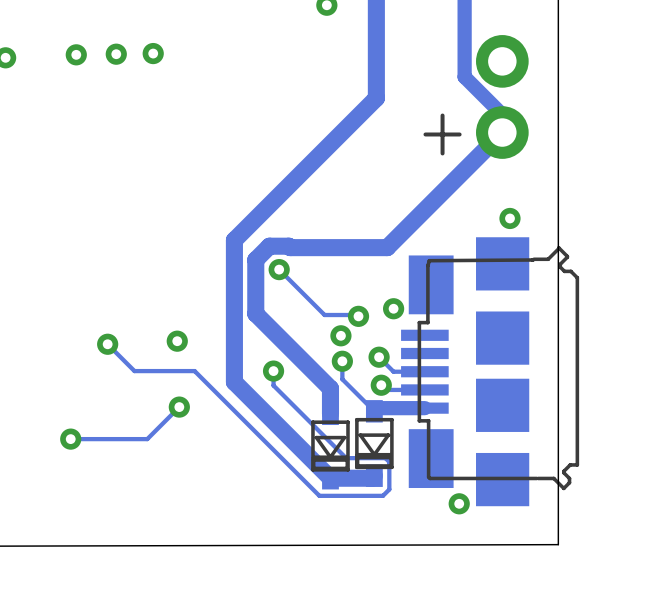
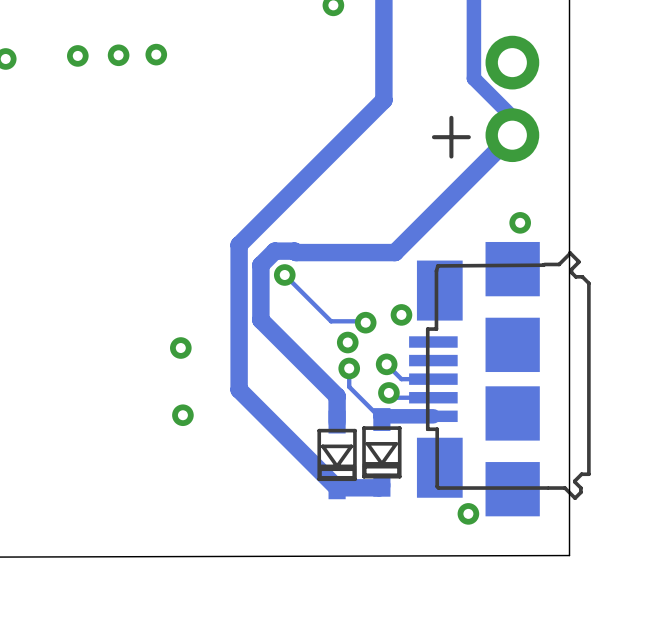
track: (107, 344) (134, 371) (194, 371) (319, 495) (382, 495) (389, 489) (389, 462) (385, 458) (346, 458) (273, 385) (273, 371) -> none
via: (107, 344) -> none
via: (273, 371) -> none
track: (179, 407) (147, 439) (70, 439) -> none
via: (70, 439) -> none

